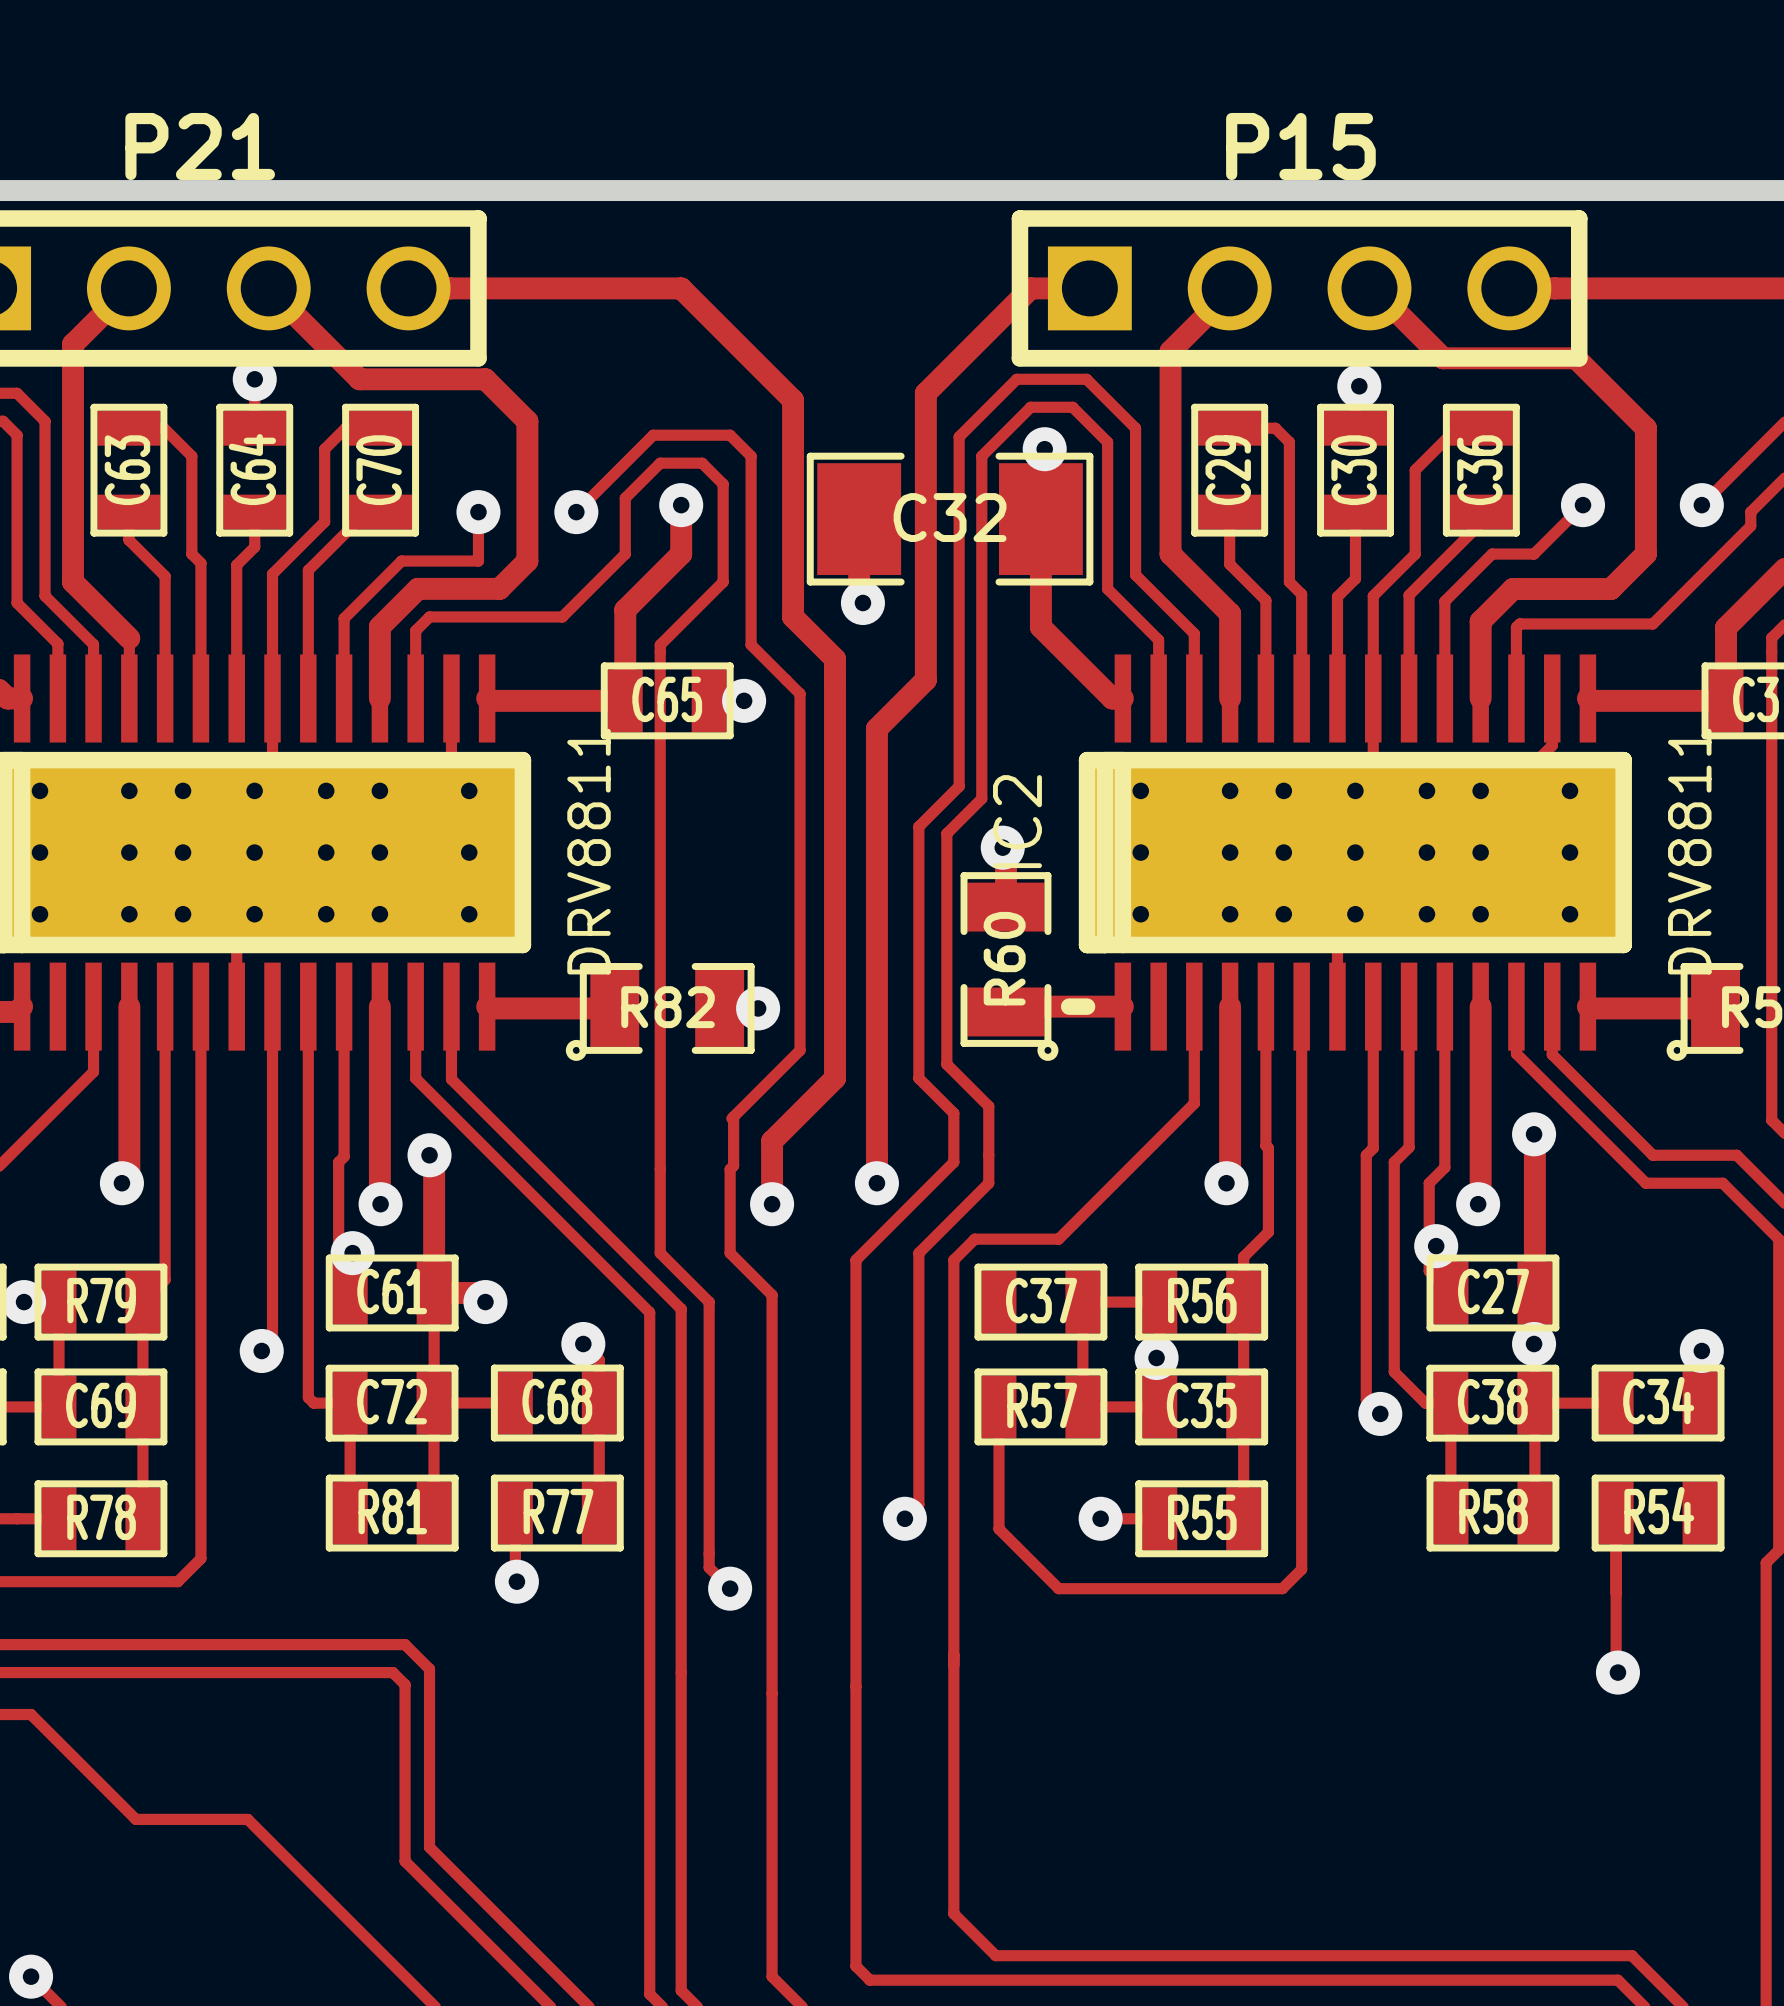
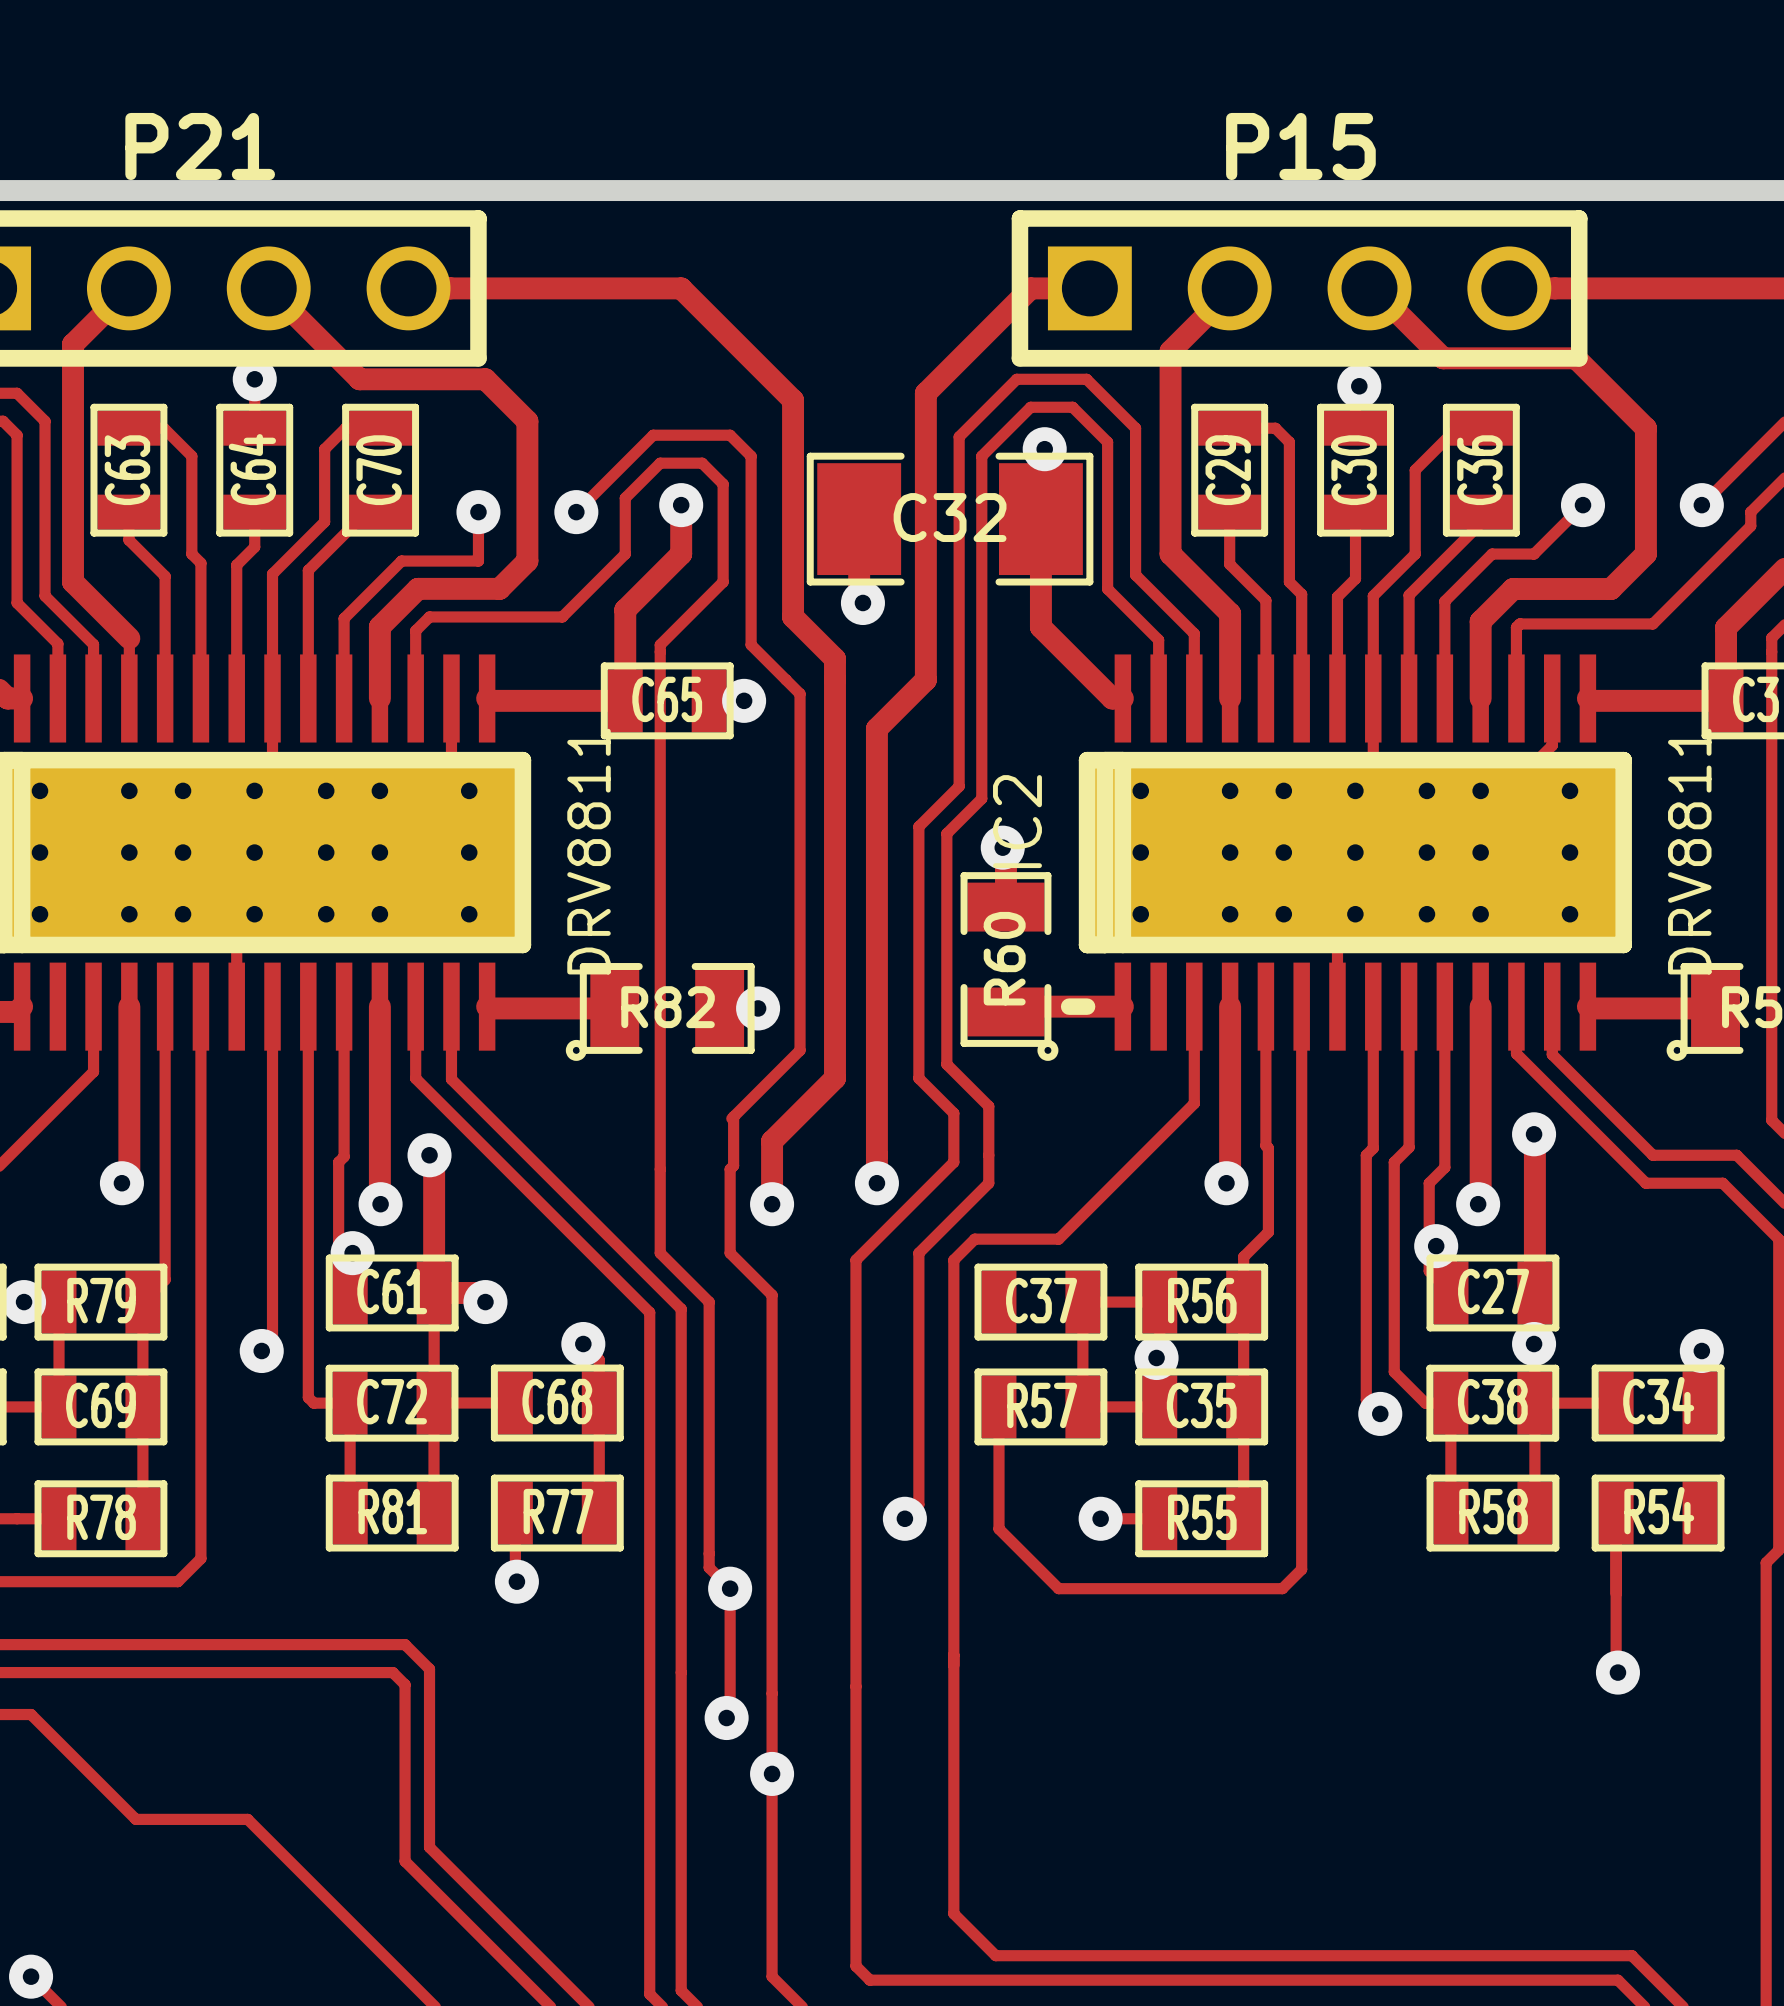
track: none -> (730, 1588) (730, 1714) (726, 1718)
via: none -> (726, 1718)
via: none -> (772, 1773)

